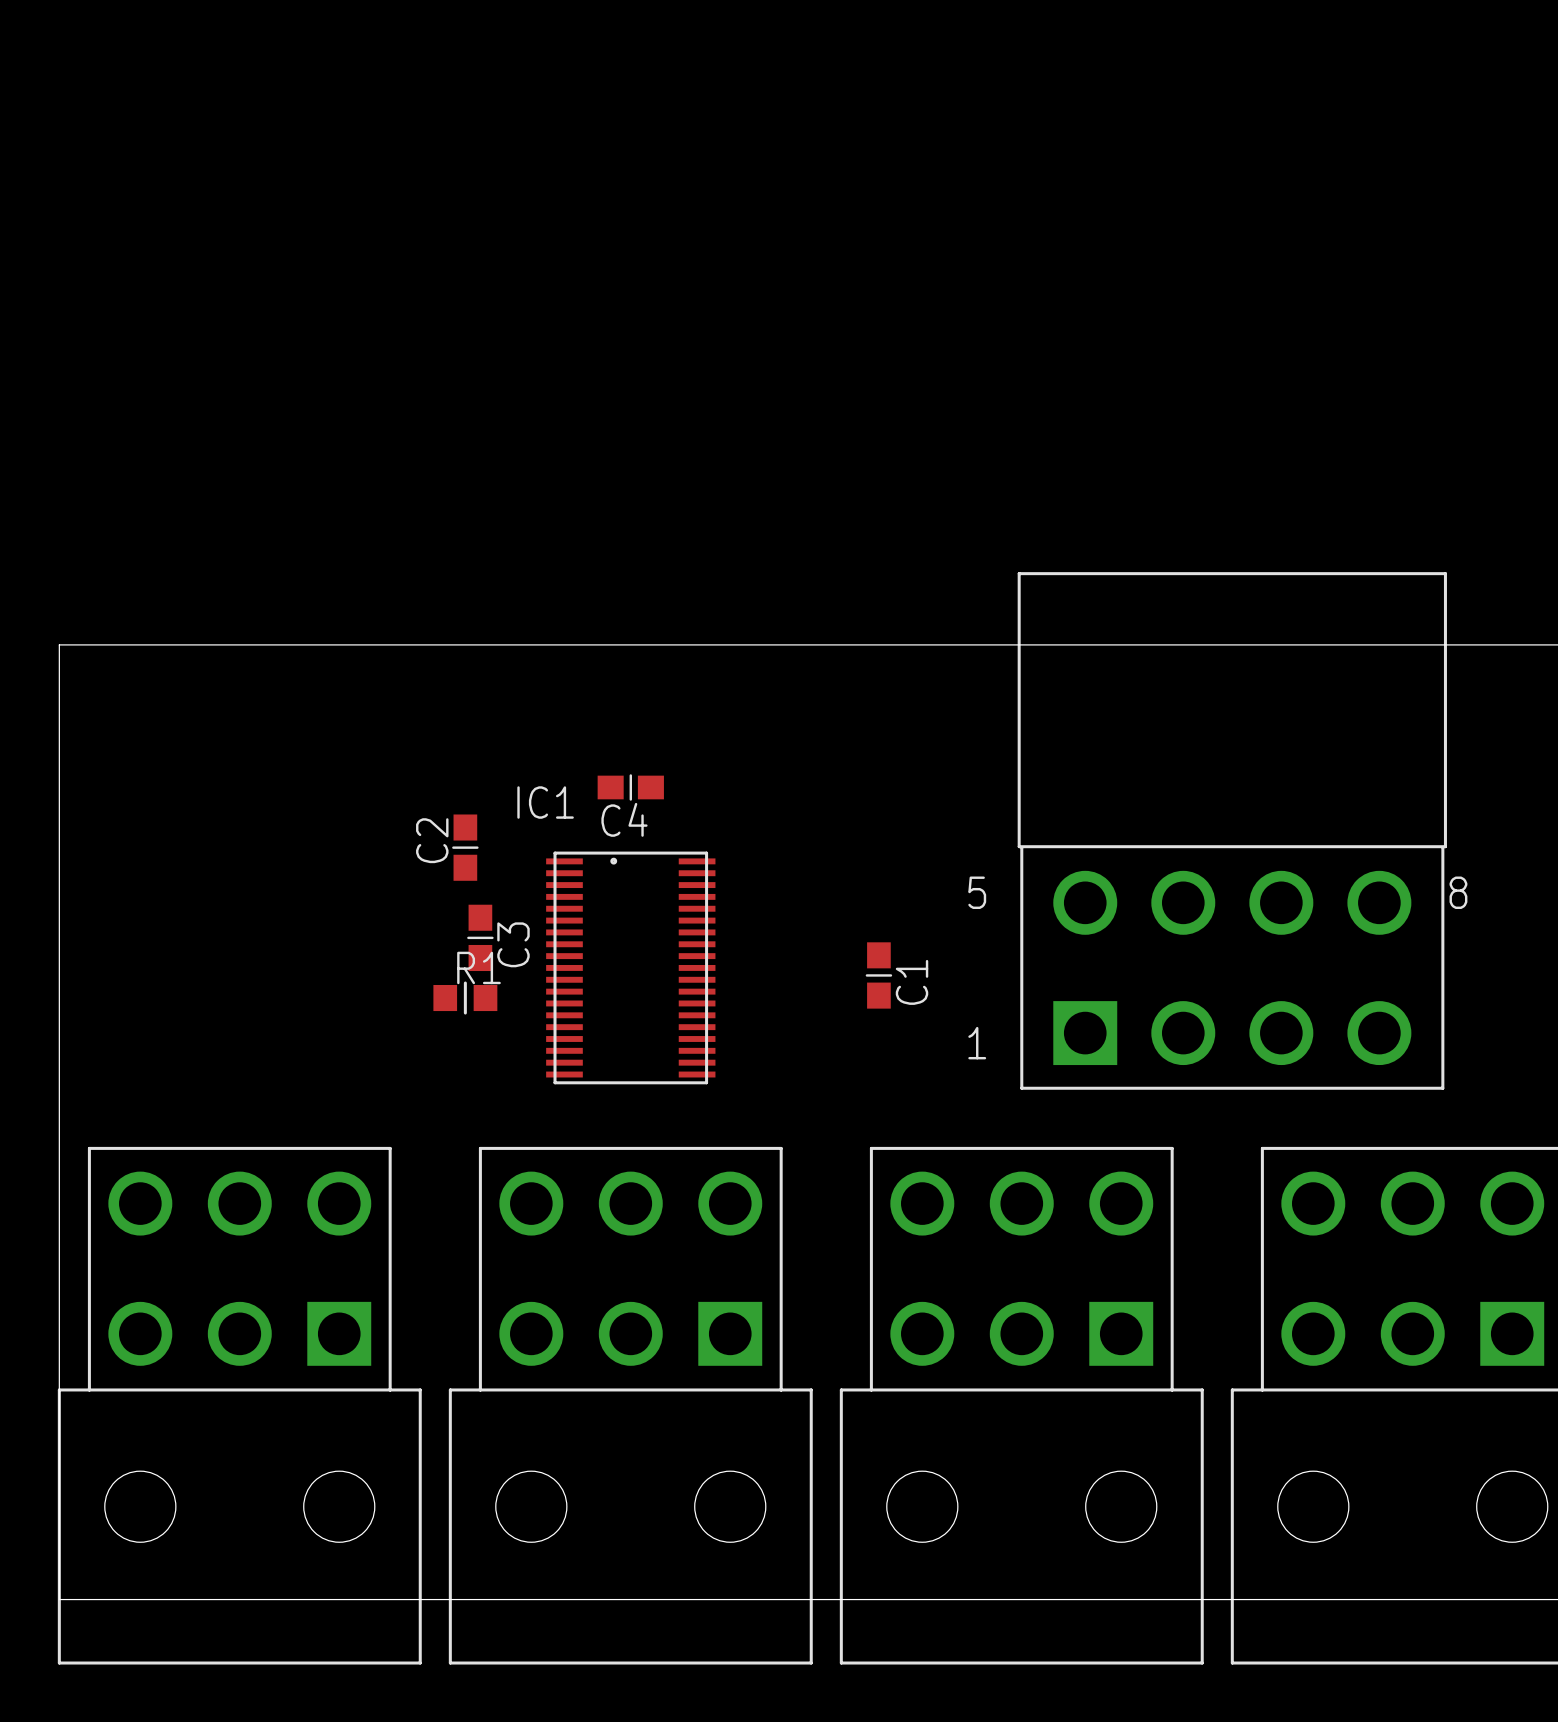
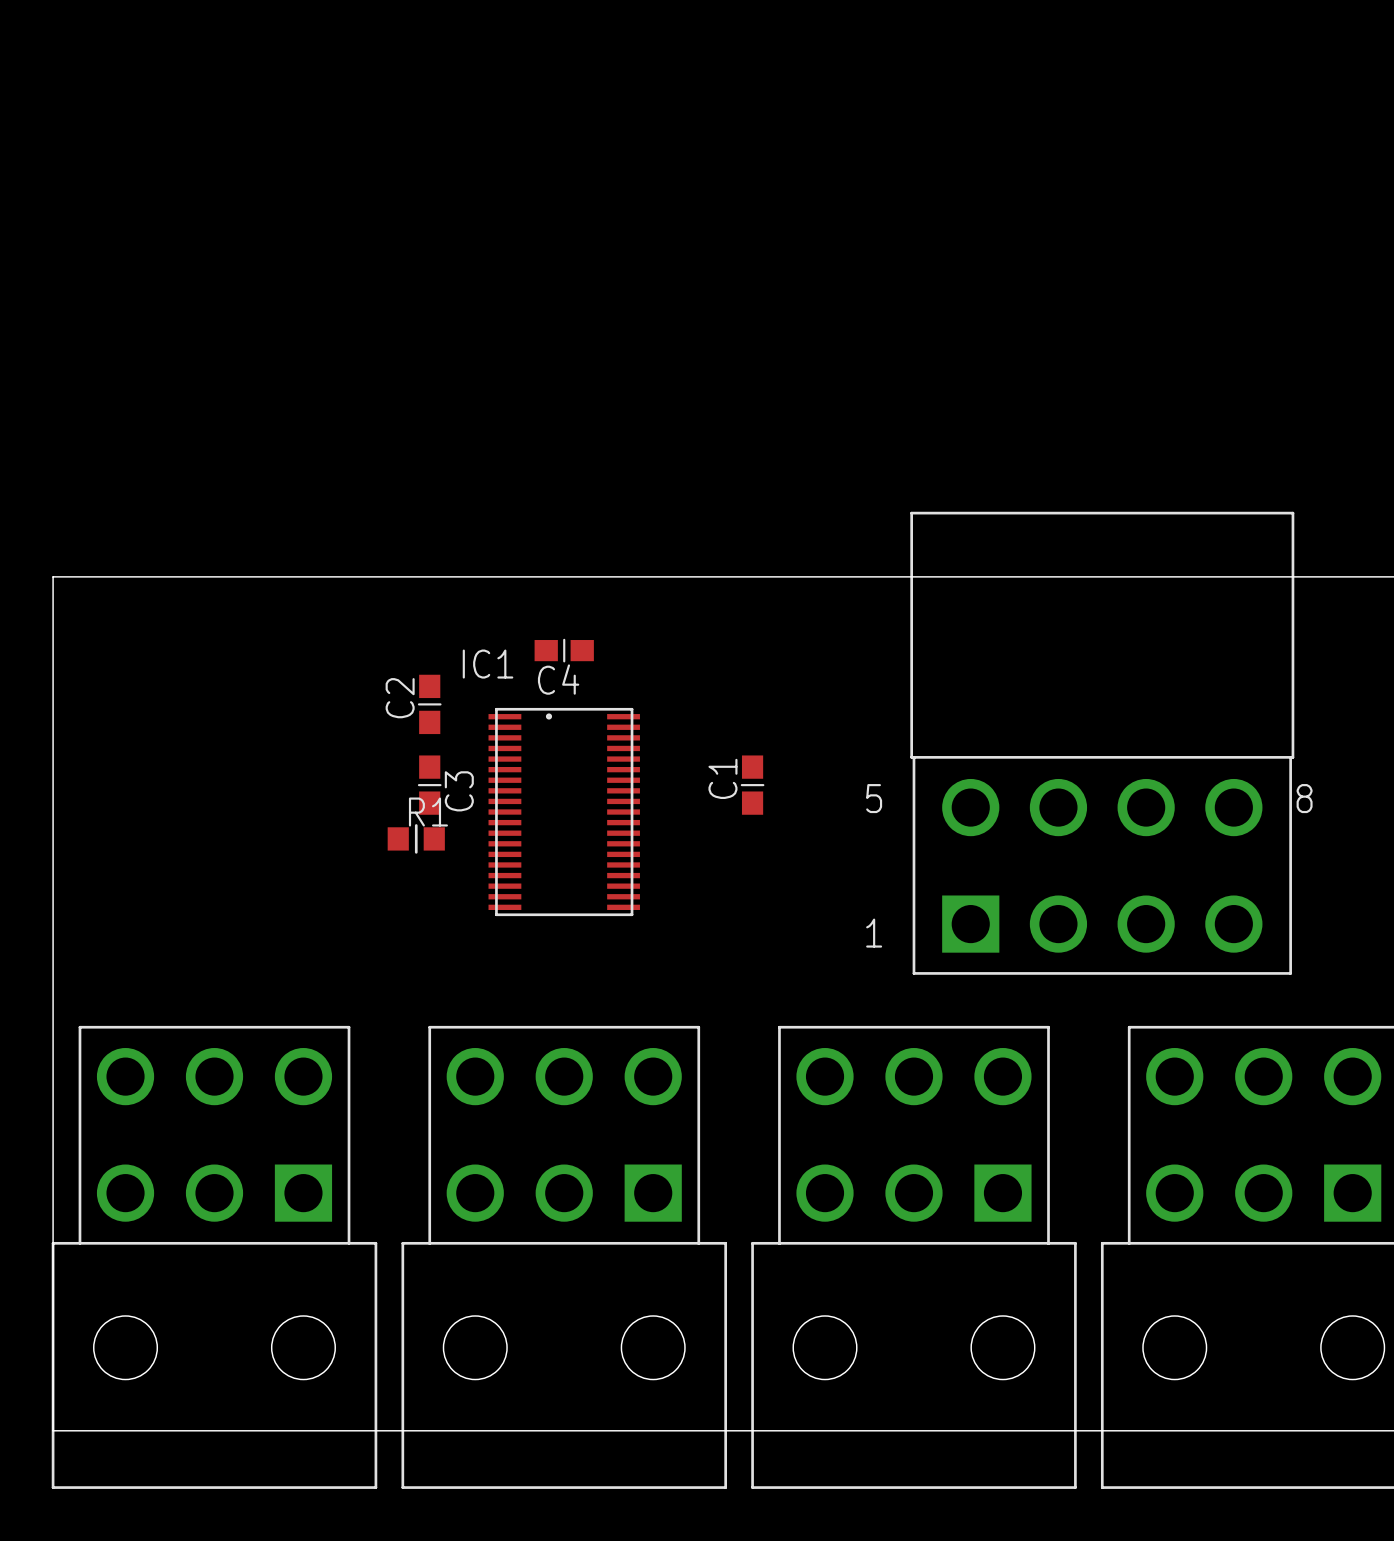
C4 position: (630, 787) -> (564, 650)
C2 position: (465, 847) -> (429, 704)
C3 position: (480, 937) -> (429, 785)
IC1 position: (630, 967) -> (564, 812)
C1 position: (878, 975) -> (752, 785)
C1 name position: C1 (912, 982) -> C1 (722, 778)
R1 position: (465, 998) -> (416, 838)

